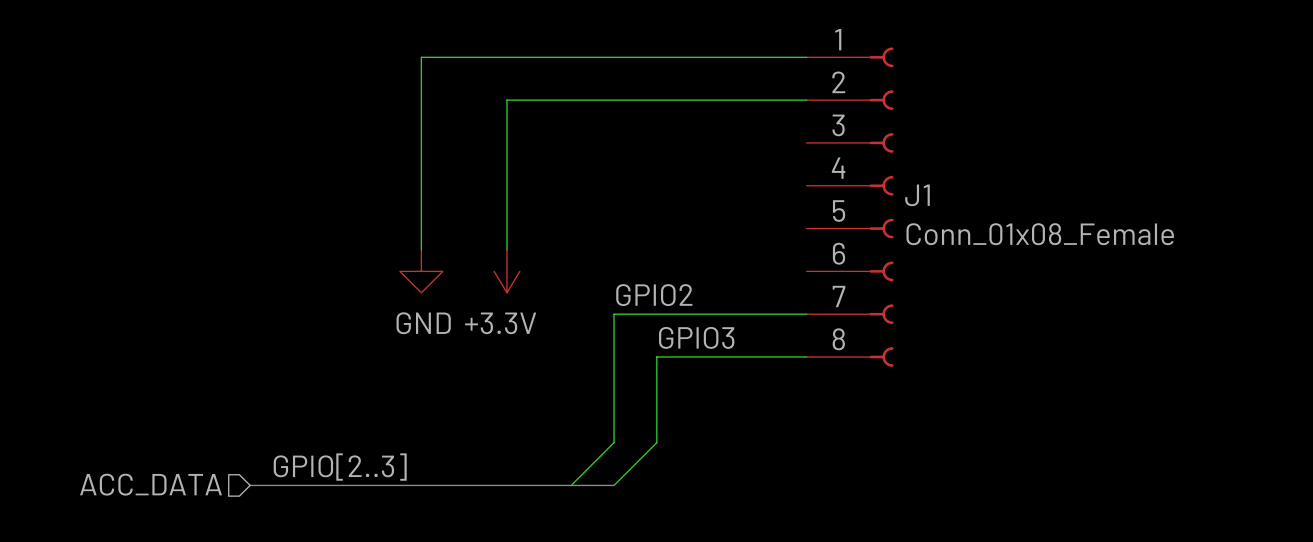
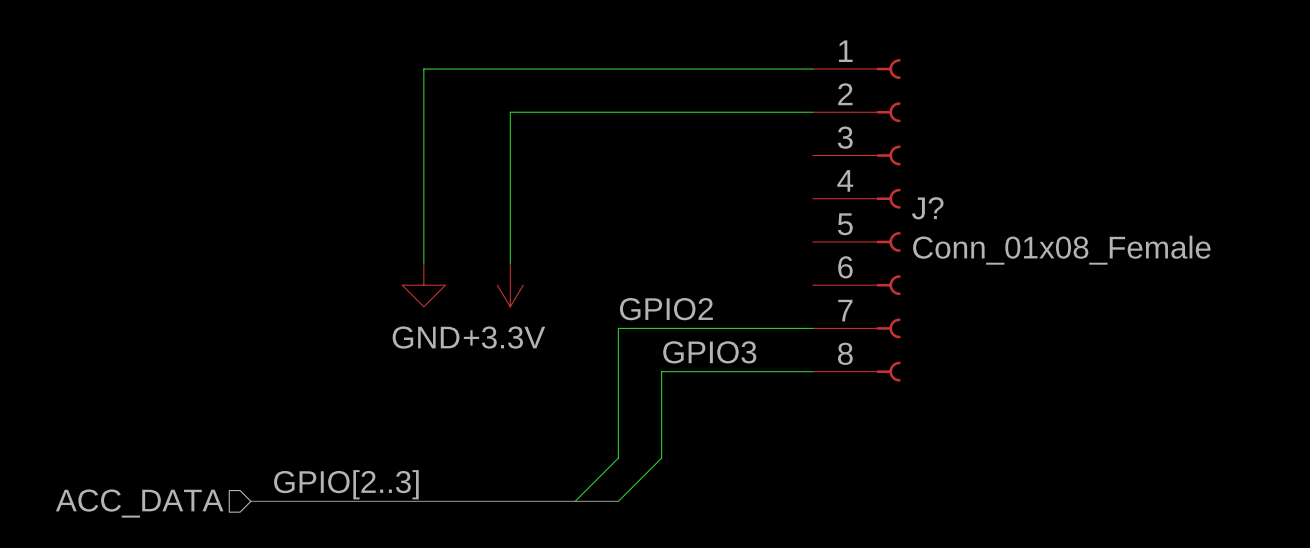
J1 name: J1 (917, 195) -> J? (927, 208)

